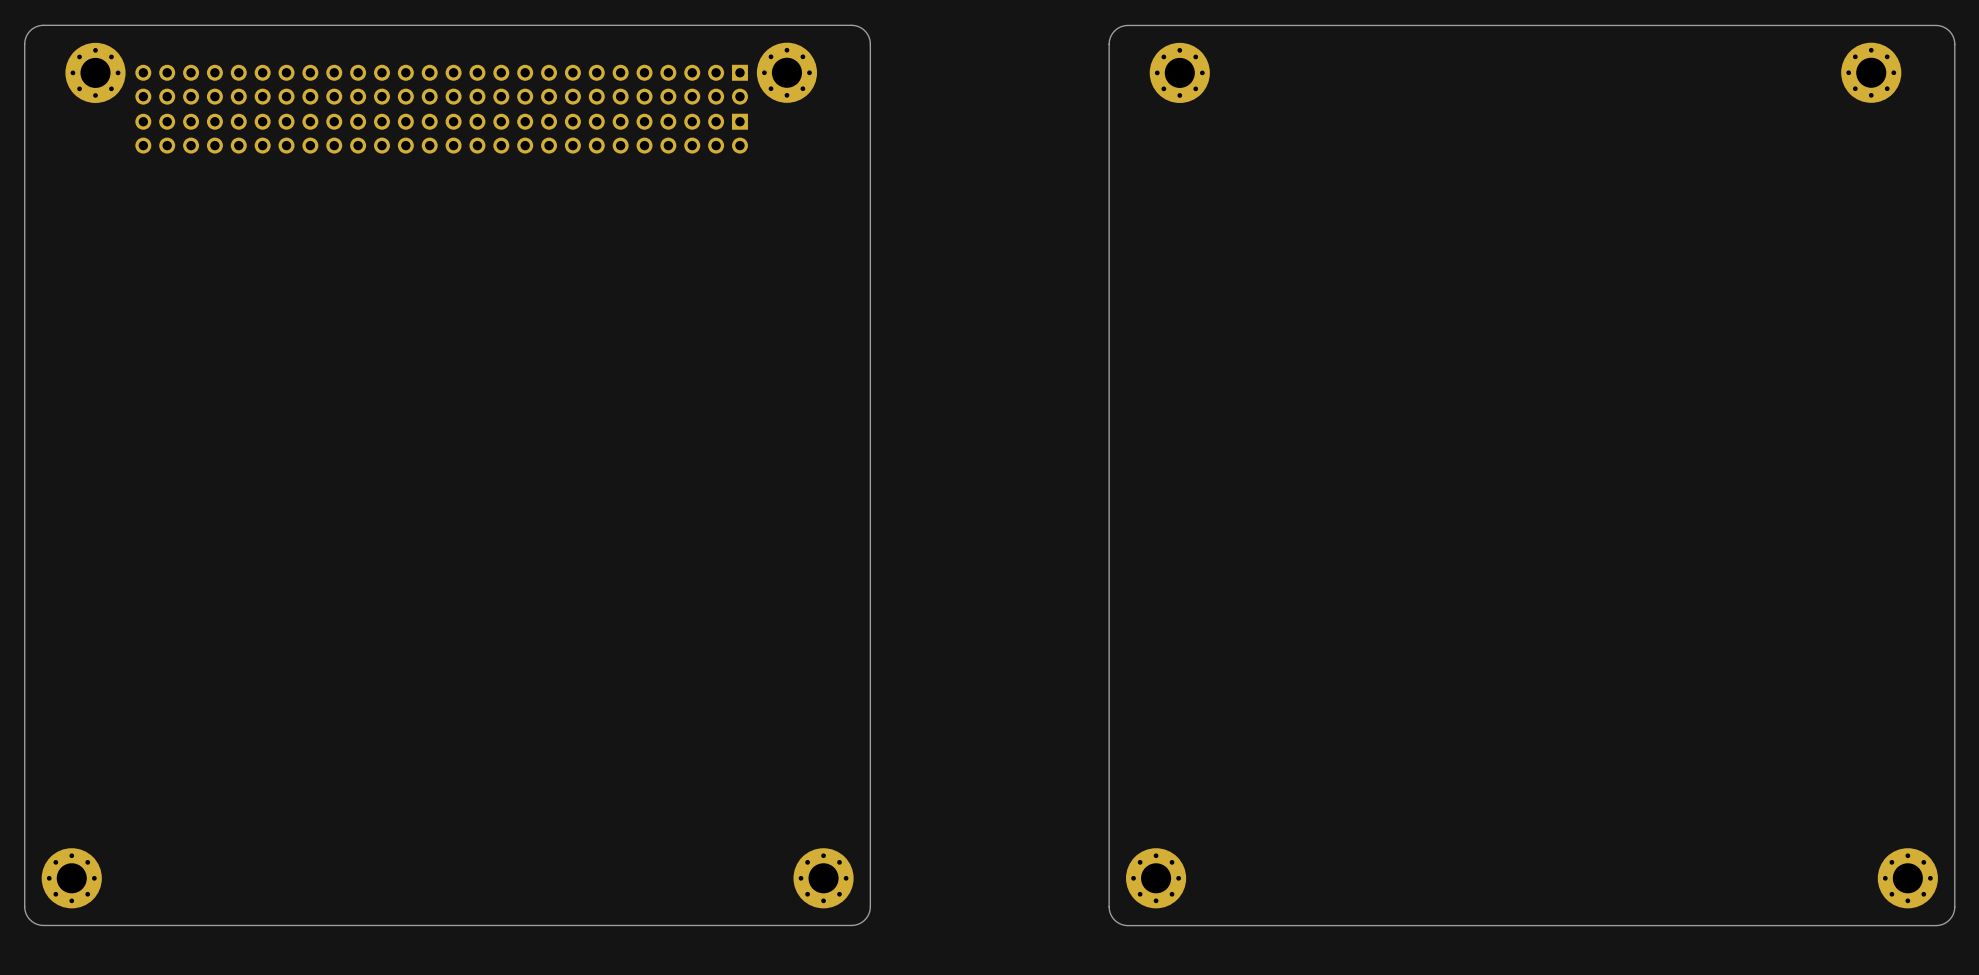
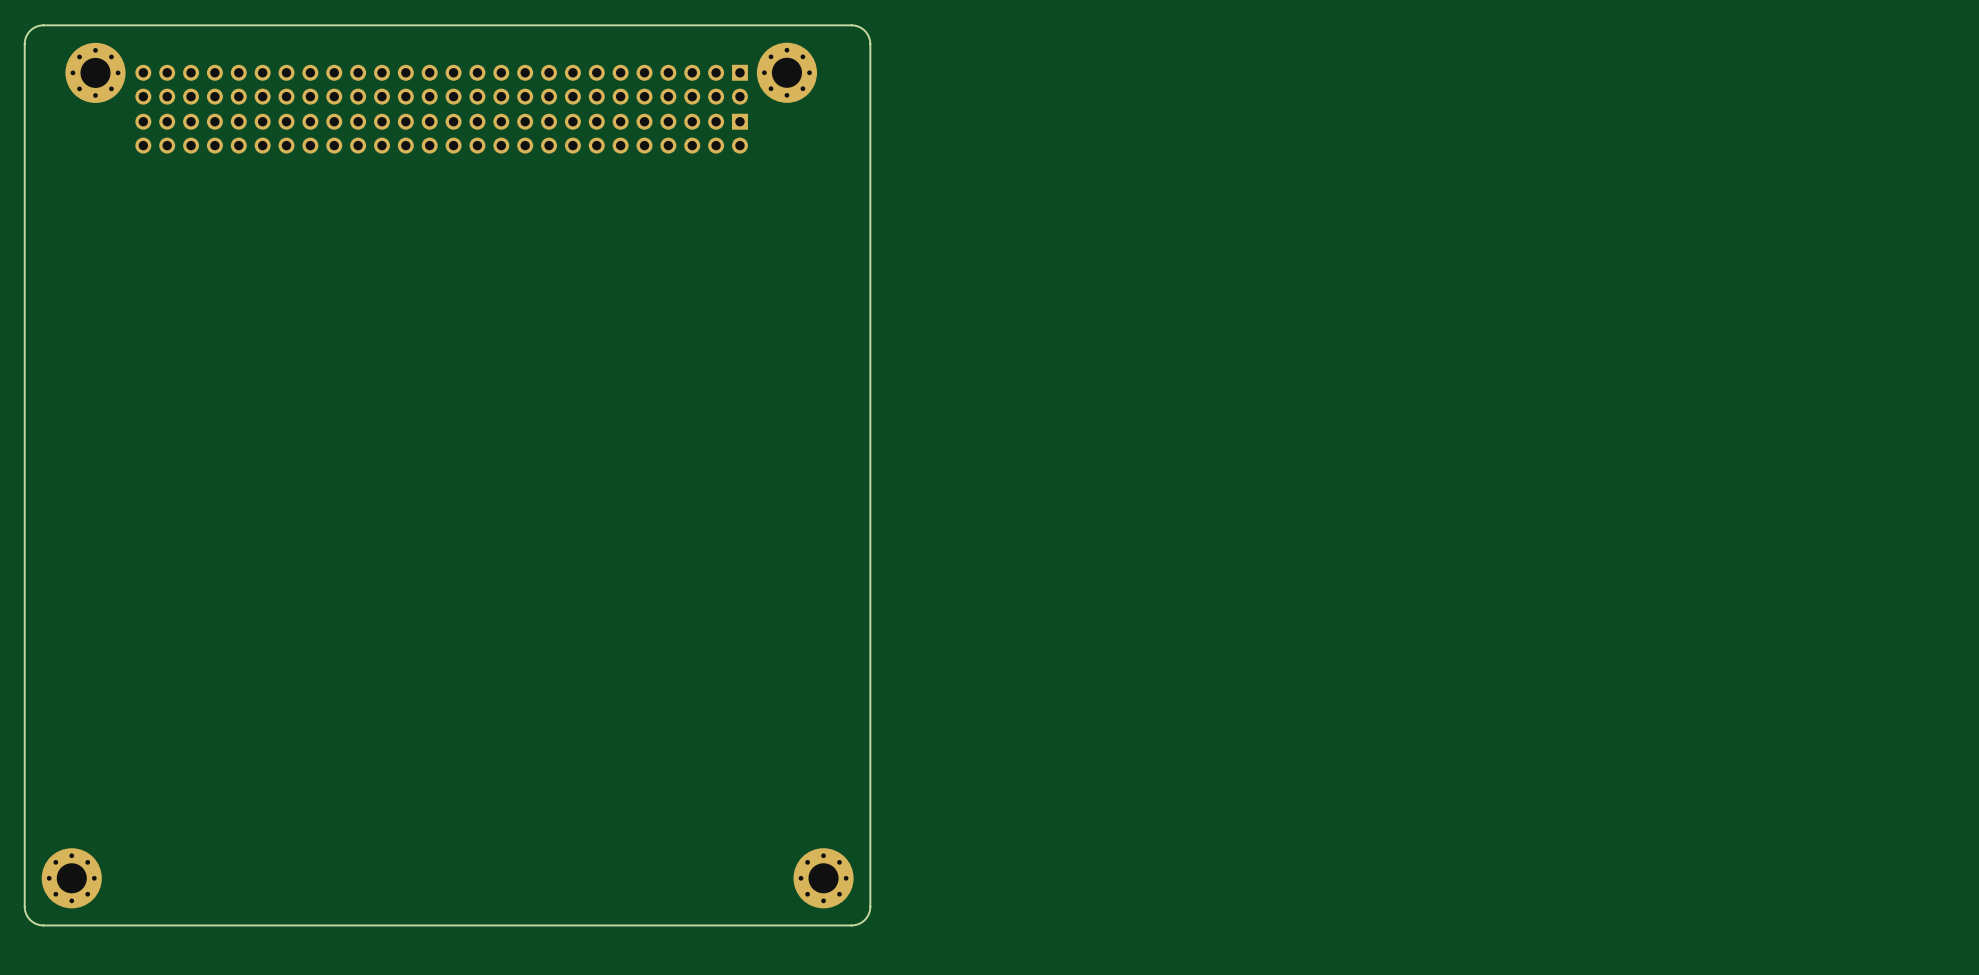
board edge: (1935, 25) (1127, 25) (1114, 30) (1109, 44) (1109, 906) (1114, 920) (1127, 925) (1935, 925) (1949, 920) (1954, 906) (1954, 44) (1949, 30) (1935, 25) -> none
part: (1179, 72) -> none
part: (1871, 72) -> none
part: (1156, 878) -> none
part: (1907, 878) -> none

